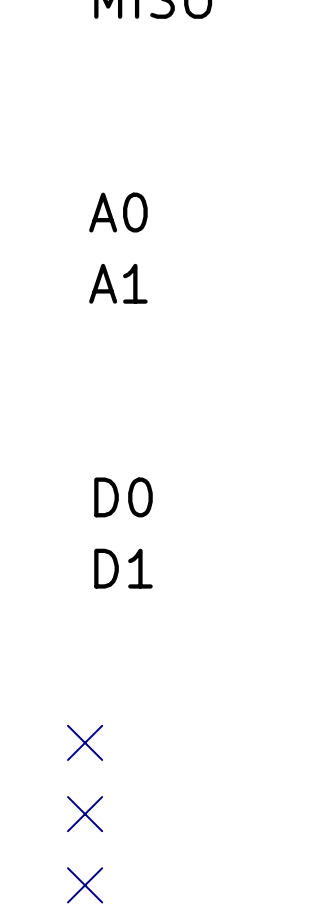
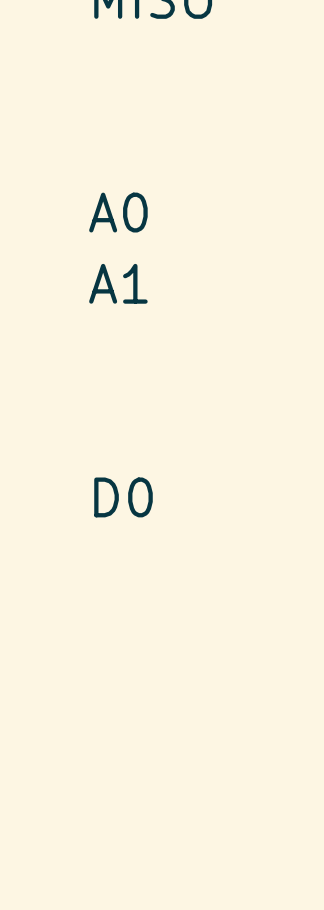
label: D1 (123, 568) -> none
no-connect mark: (85, 742) -> none
no-connect mark: (85, 814) -> none
no-connect mark: (85, 885) -> none

